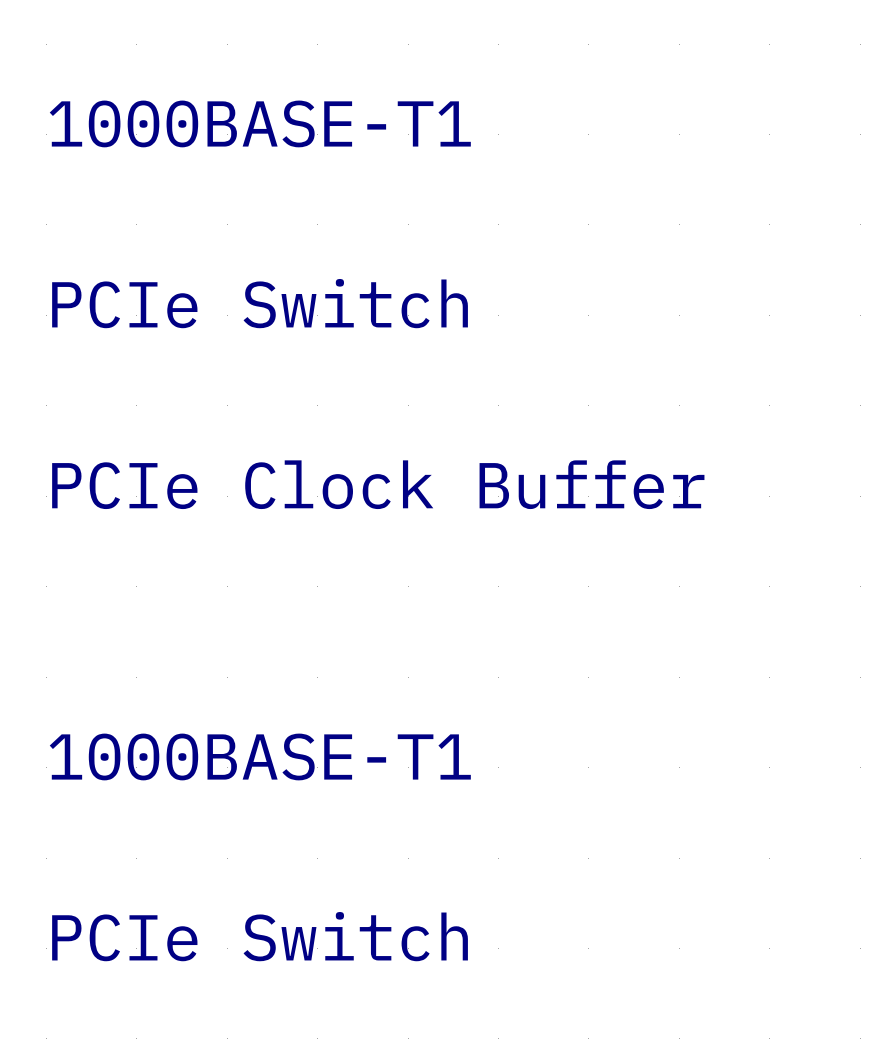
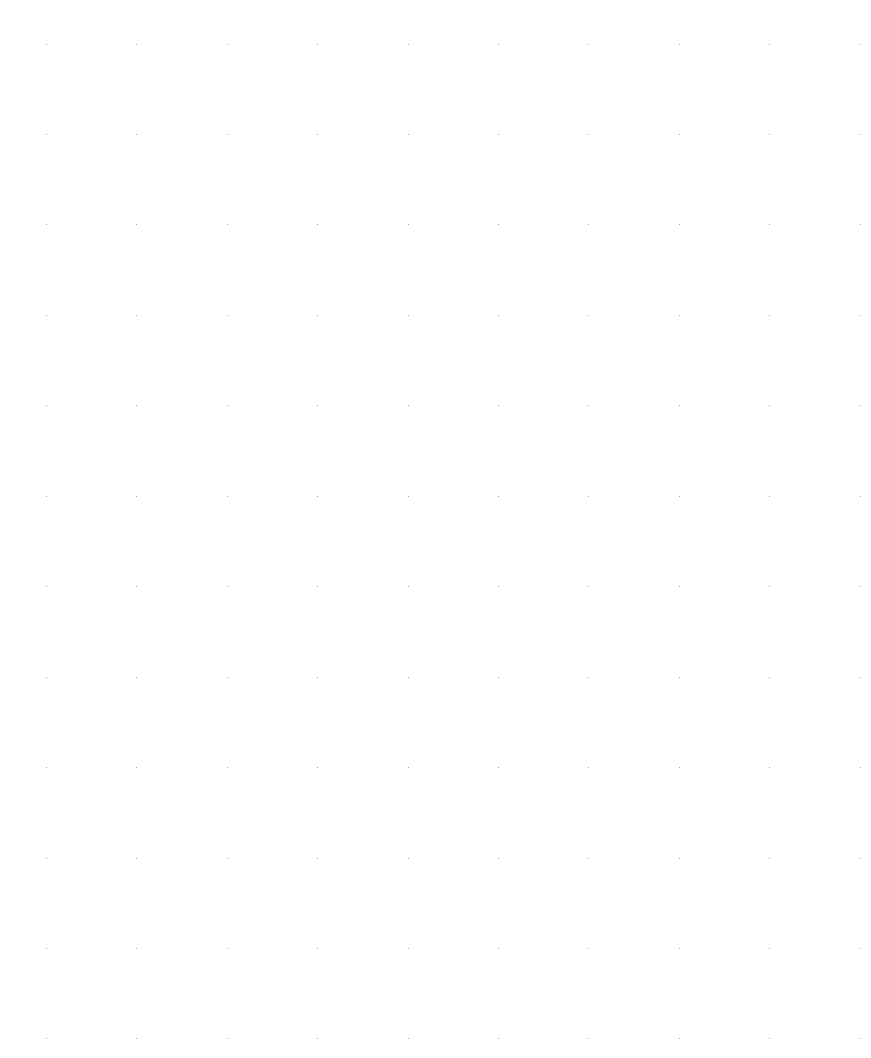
text: 1000BASE-T1 (260, 123) -> none
text: PCIe Switch (260, 303) -> none
text: PCIe Clock Buffer (378, 484) -> none
text: 1000BASE-T1 (260, 756) -> none
text: PCIe Switch (260, 936) -> none

